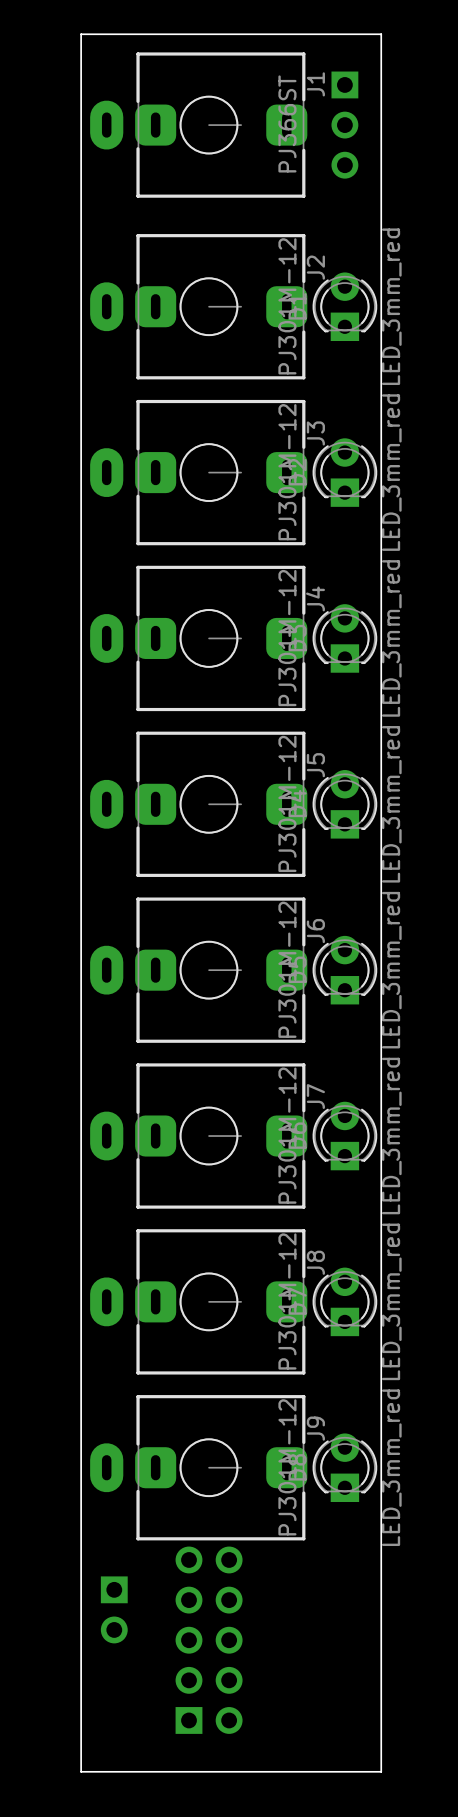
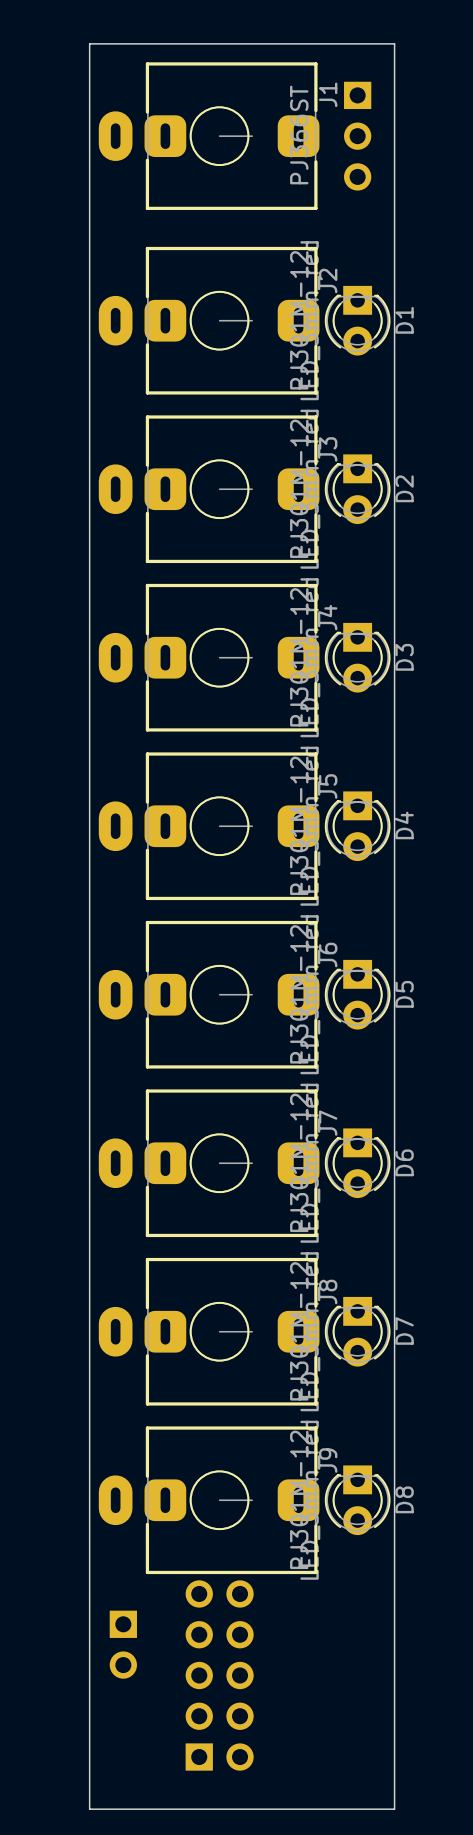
D1 rotation: 0° (344, 306) -> 180° (357, 320)
D2 rotation: 0° (344, 472) -> 180° (357, 489)
D3 rotation: 0° (344, 638) -> 180° (357, 657)
D4 rotation: 0° (344, 804) -> 180° (357, 826)
D5 rotation: 0° (344, 970) -> 180° (357, 994)
D6 rotation: 0° (344, 1136) -> 180° (357, 1163)
D7 rotation: 0° (344, 1301) -> 180° (357, 1331)
D8 rotation: 0° (344, 1467) -> 180° (357, 1500)

